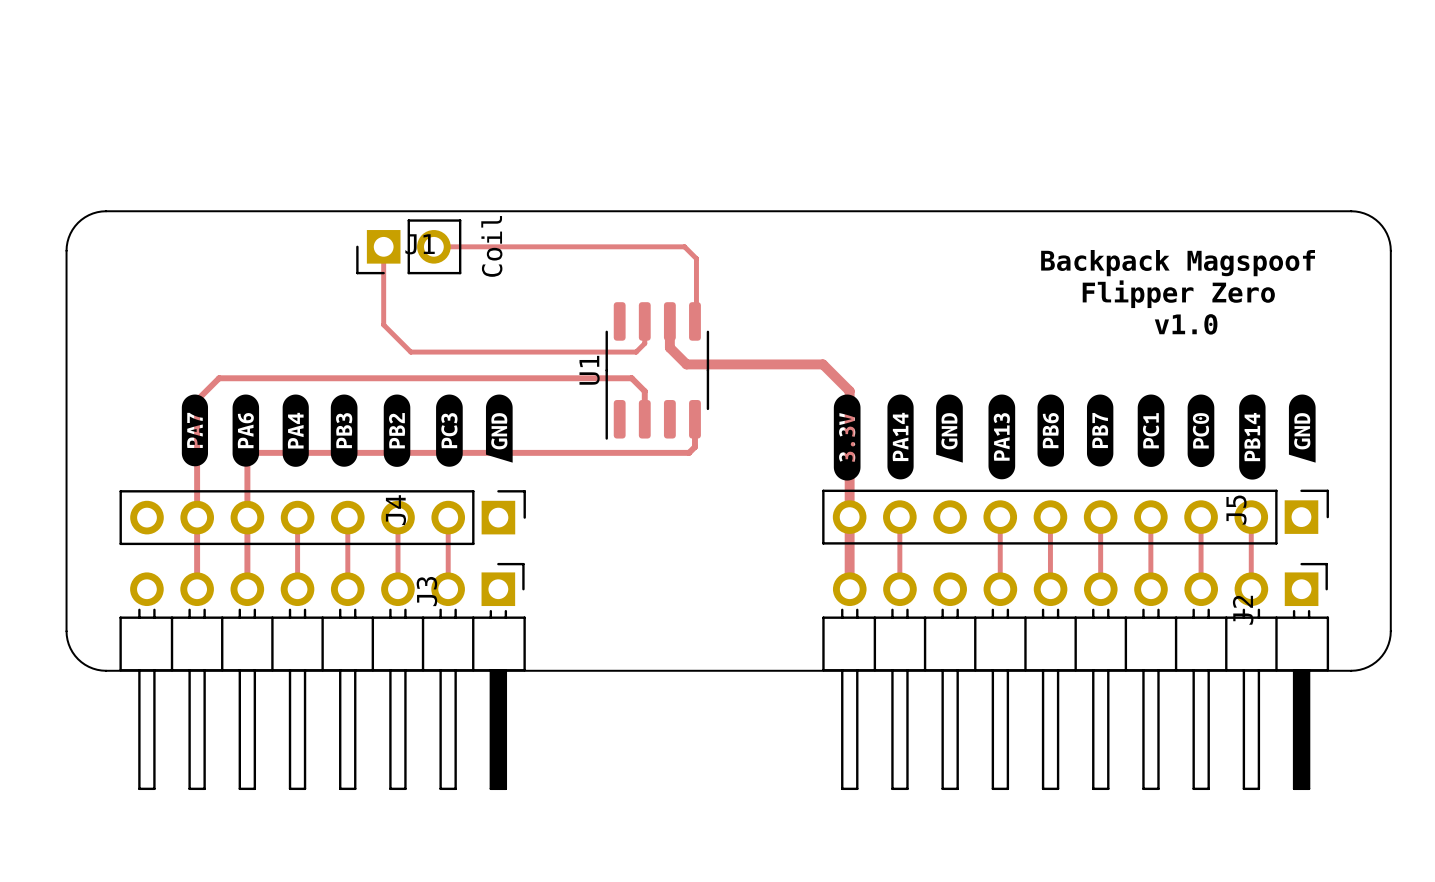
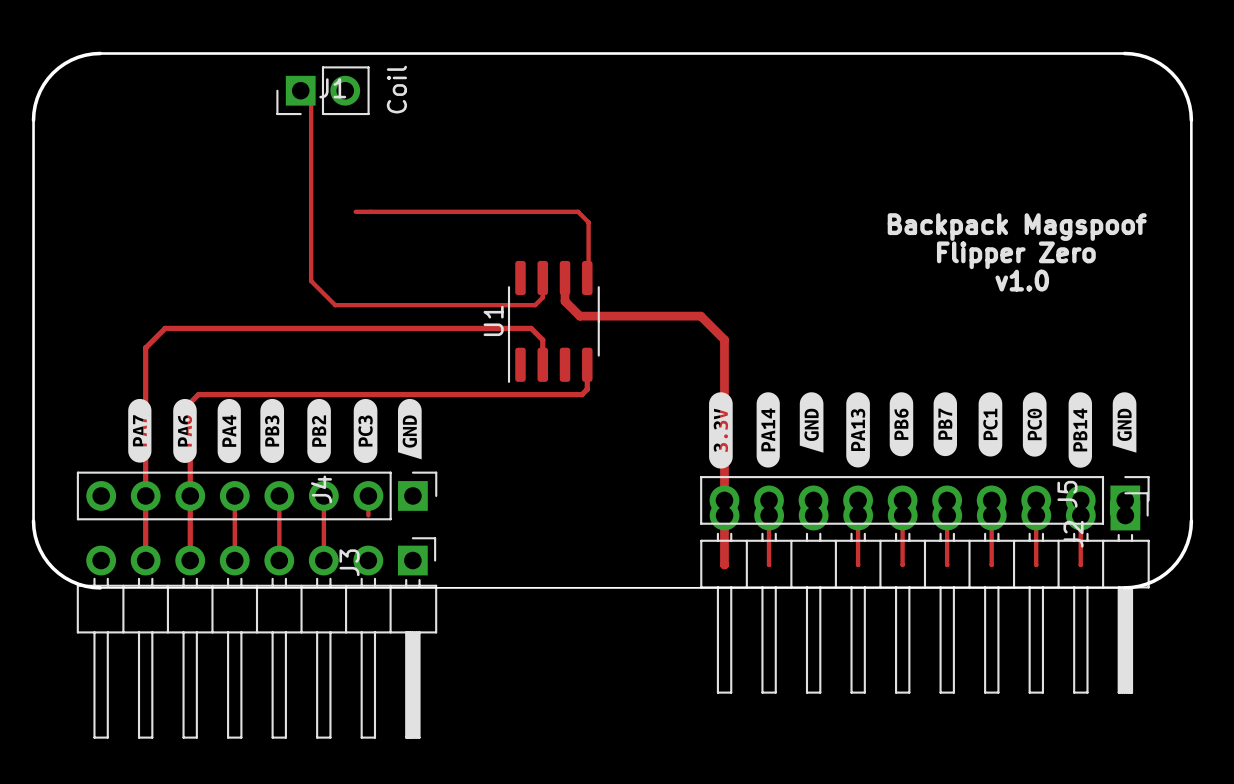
track: none -> (300, 90) (311, 101) (311, 211)
J1 position: (408, 246) -> (322, 90)
drawing position: (499, 428) -> (409, 429)
drawing position: (949, 428) -> (811, 422)
drawing position: (1302, 428) -> (1124, 422)
drawing position: (194, 430) -> (139, 430)
drawing position: (245, 430) -> (184, 430)
drawing position: (295, 430) -> (229, 431)
drawing position: (344, 430) -> (272, 430)
drawing position: (397, 430) -> (319, 431)
drawing position: (449, 430) -> (365, 430)
drawing position: (1050, 430) -> (901, 424)
drawing position: (1100, 430) -> (945, 424)
drawing position: (1151, 430) -> (990, 424)
drawing position: (1200, 430) -> (1034, 424)
drawing position: (900, 436) -> (768, 429)
drawing position: (1001, 436) -> (858, 429)
drawing position: (847, 437) -> (720, 430)
drawing position: (1252, 437) -> (1080, 430)
track: (297, 517) (297, 567) -> none
J4 position: (322, 517) -> (257, 495)
track: (347, 517) (347, 567) -> none
track: (398, 517) (398, 567) -> none
track: (448, 517) (448, 567) -> none
track: (899, 517) (899, 572) -> none
track: (1000, 517) (1000, 572) -> none
track: (1050, 517) (1050, 572) -> none
J5 position: (1075, 517) -> (924, 500)
track: (1100, 517) (1100, 572) -> none
track: (1150, 517) (1150, 572) -> none
track: (1201, 517) (1201, 572) -> none
track: (1251, 517) (1251, 572) -> none
track: none -> (145, 515) (145, 560)
track: none -> (190, 515) (190, 560)
track: none -> (234, 515) (234, 560)
track: none -> (279, 515) (279, 560)
track: none -> (323, 515) (323, 560)
track: none -> (724, 515) (724, 564)
track: none -> (769, 515) (769, 564)
track: none -> (858, 515) (858, 564)
track: none -> (902, 515) (902, 564)
track: none -> (947, 515) (947, 564)
track: none -> (991, 515) (991, 564)
track: none -> (1036, 515) (1036, 564)
track: none -> (1080, 515) (1080, 564)
board edge: (146, 670) (101, 670) (88, 666) (72, 652) (66, 635) (66, 246) (75, 226) (93, 213) (106, 211) (1355, 211) (1368, 215) (1379, 222) (1386, 233) (1390, 246) (1390, 635) (1382, 655) (1364, 668) (1351, 670) (1300, 670) -> (100, 587) (78, 584) (64, 577) (53, 568) (40, 550) (35, 535) (33, 521) (33, 112) (40, 91) (48, 78) (58, 68) (78, 57) (100, 53) (1124, 53) (1139, 55) (1153, 60) (1166, 68) (1176, 78) (1187, 98) (1190, 112) (1191, 521) (1187, 543) (1181, 556) (1171, 568) (1153, 581) (1139, 586) (1124, 587)
J3 position: (322, 676) -> (257, 637)

